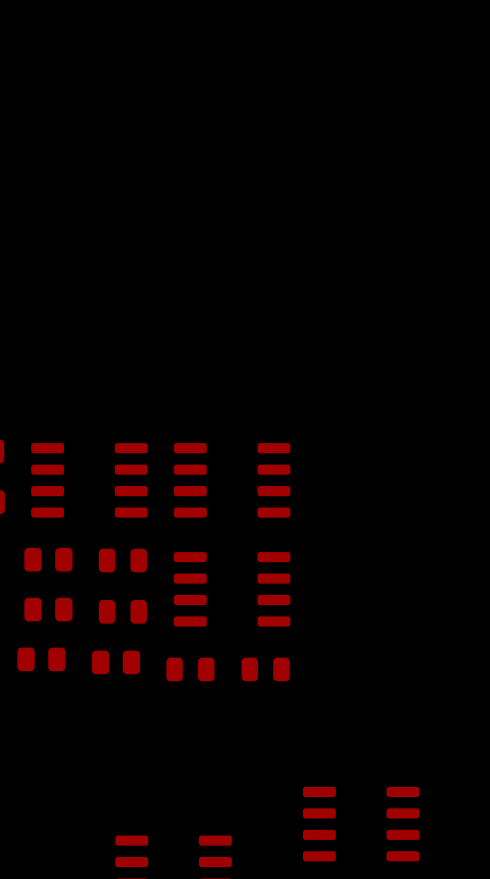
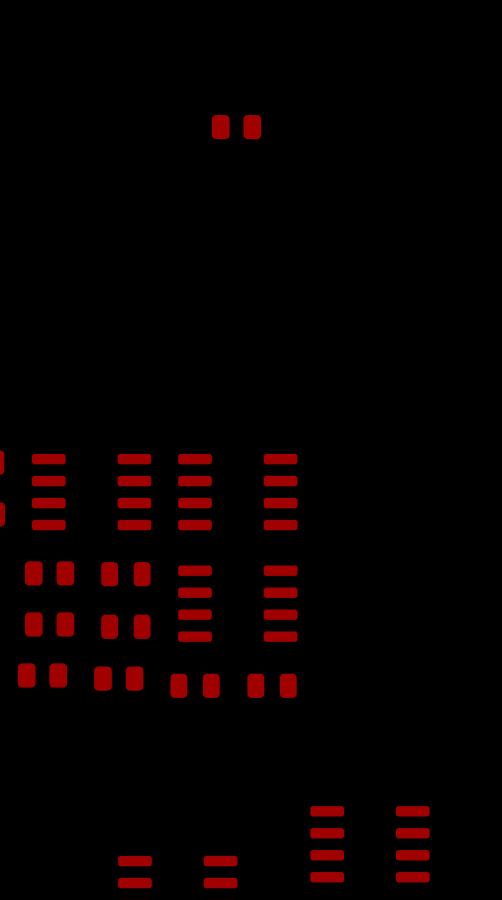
part: none -> (236, 127)

